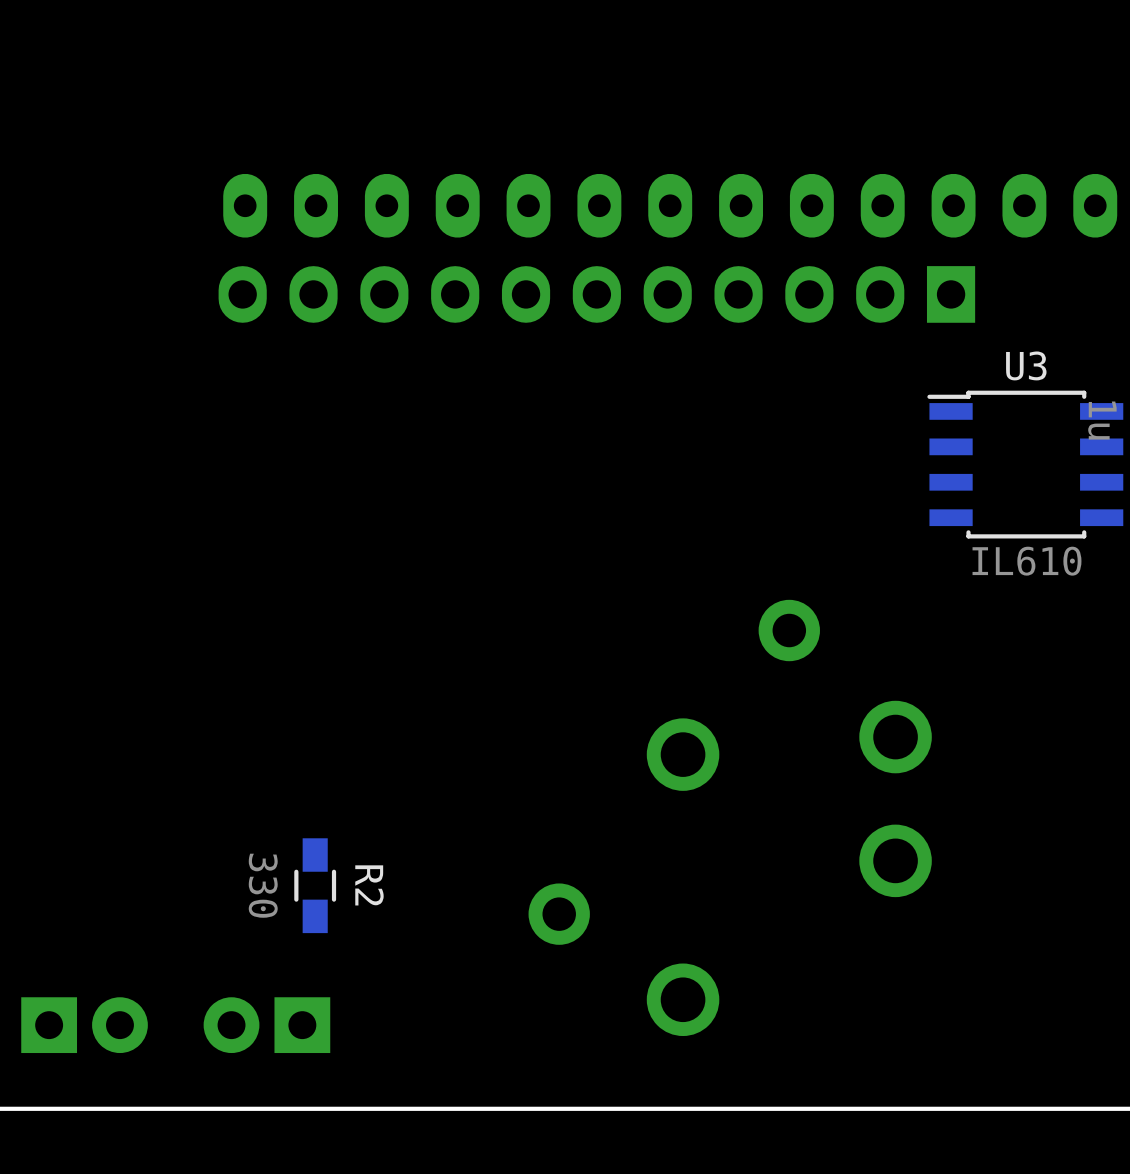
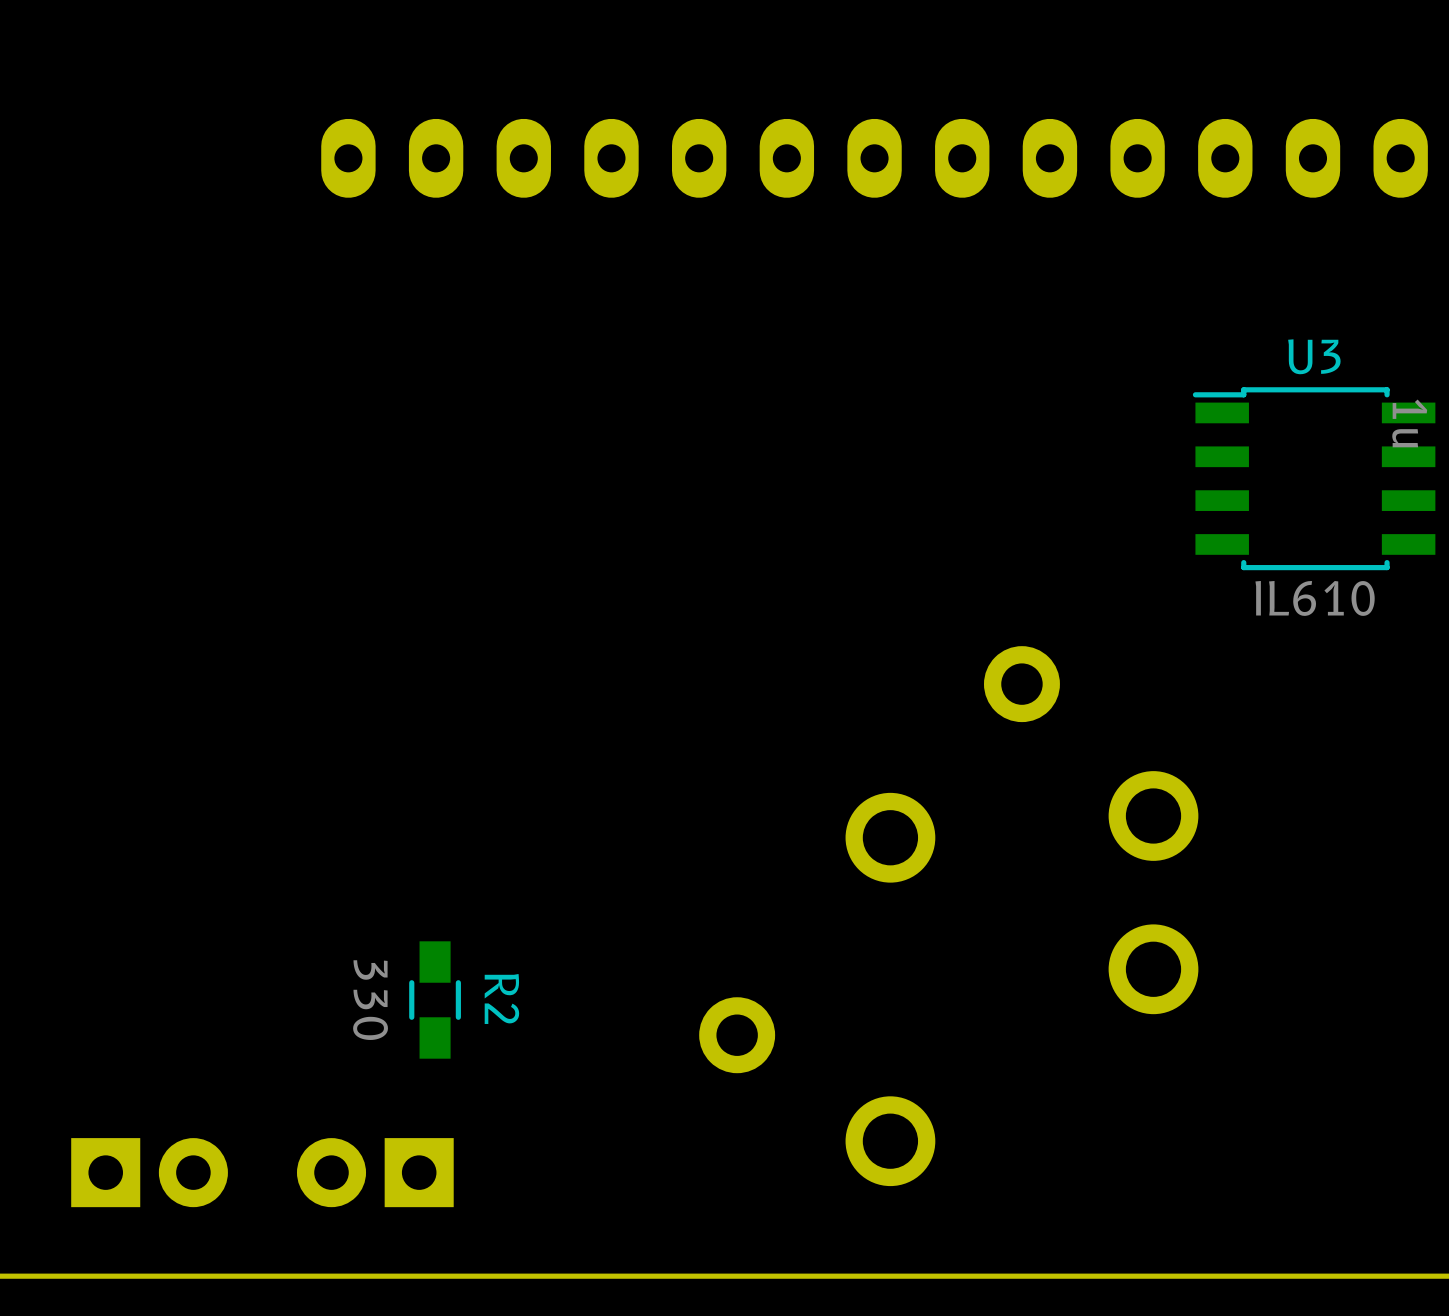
part: (596, 294) -> none

